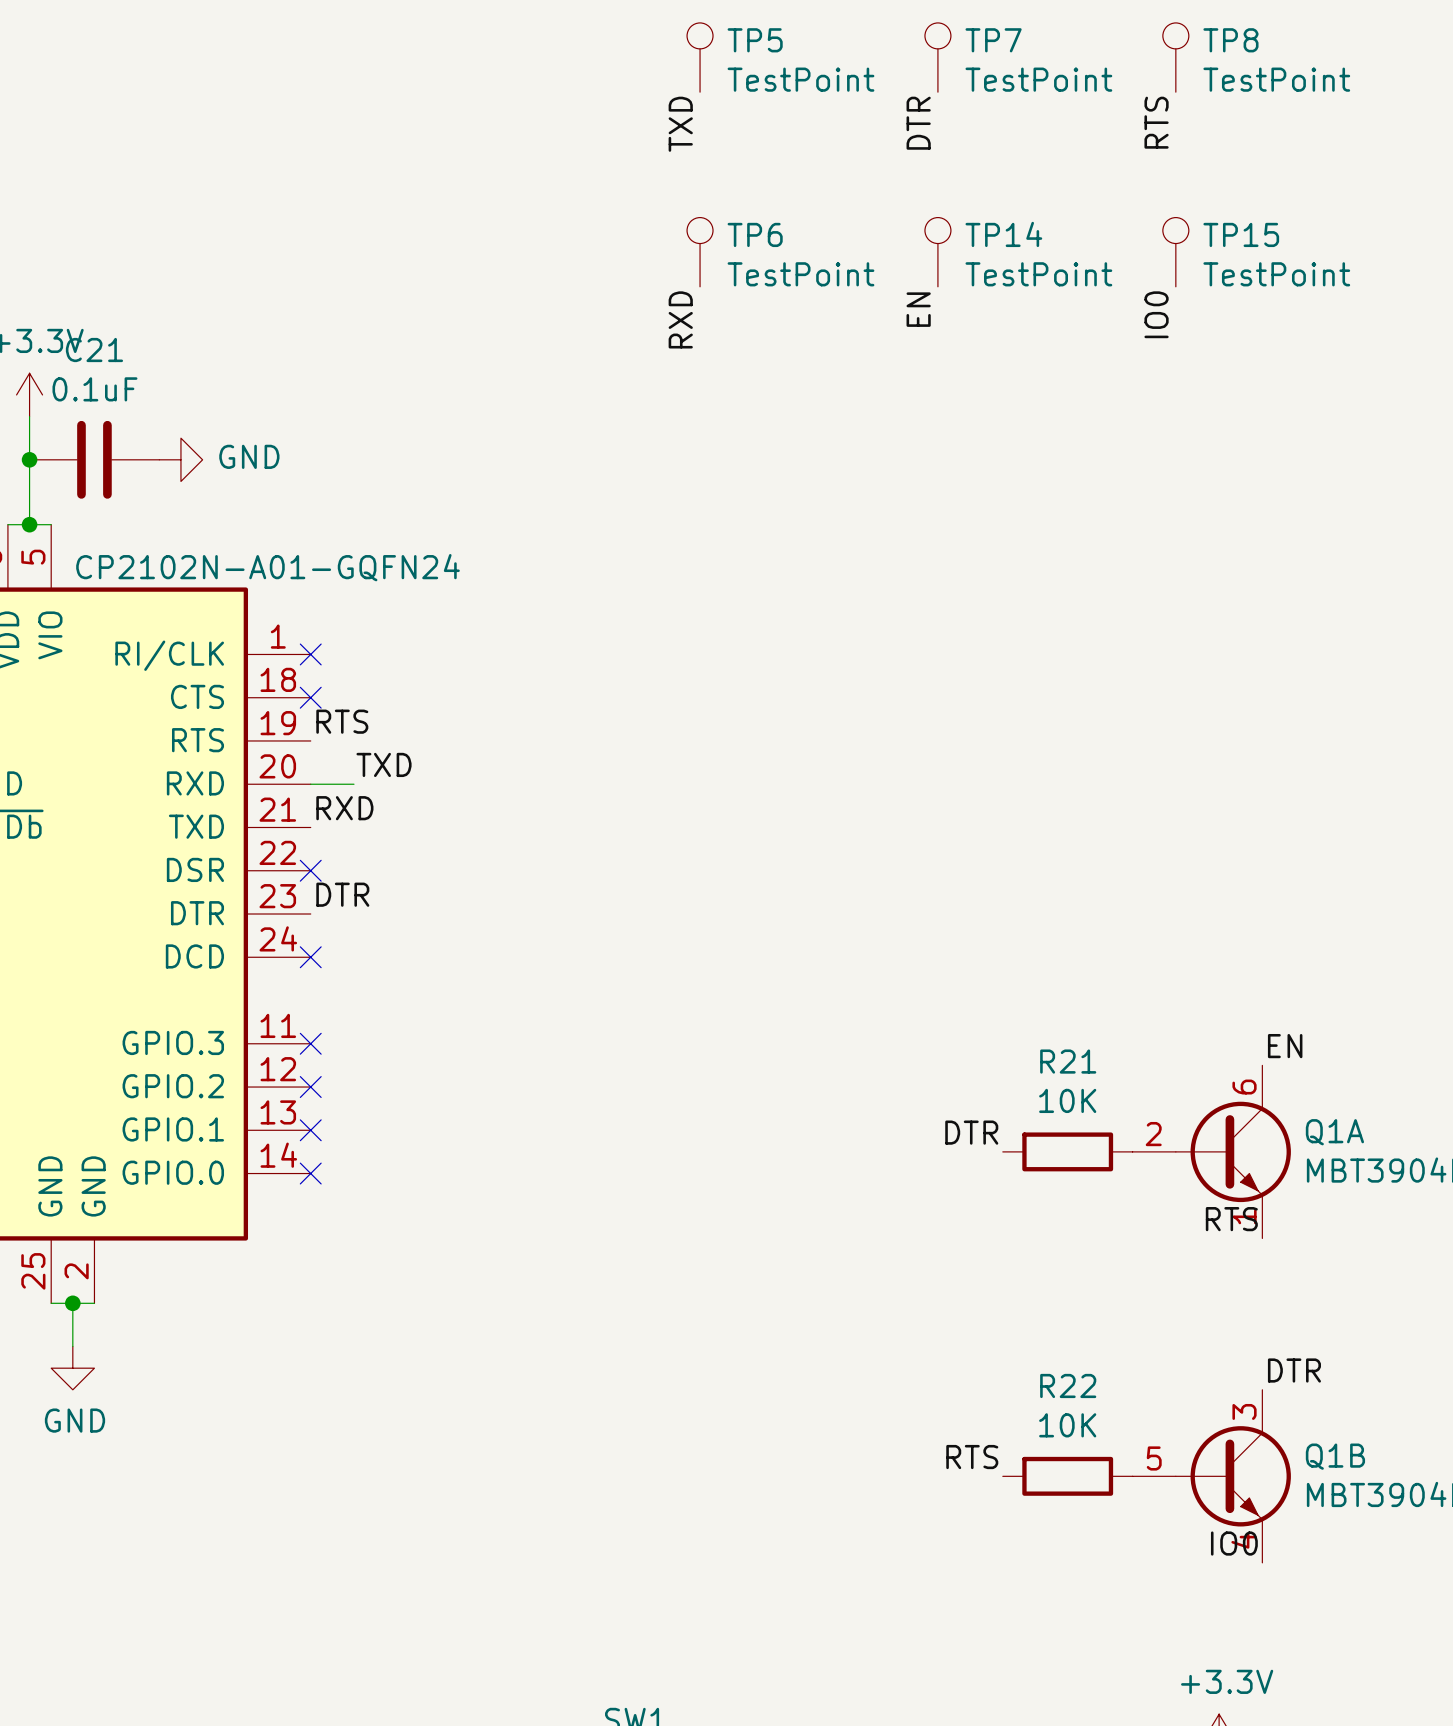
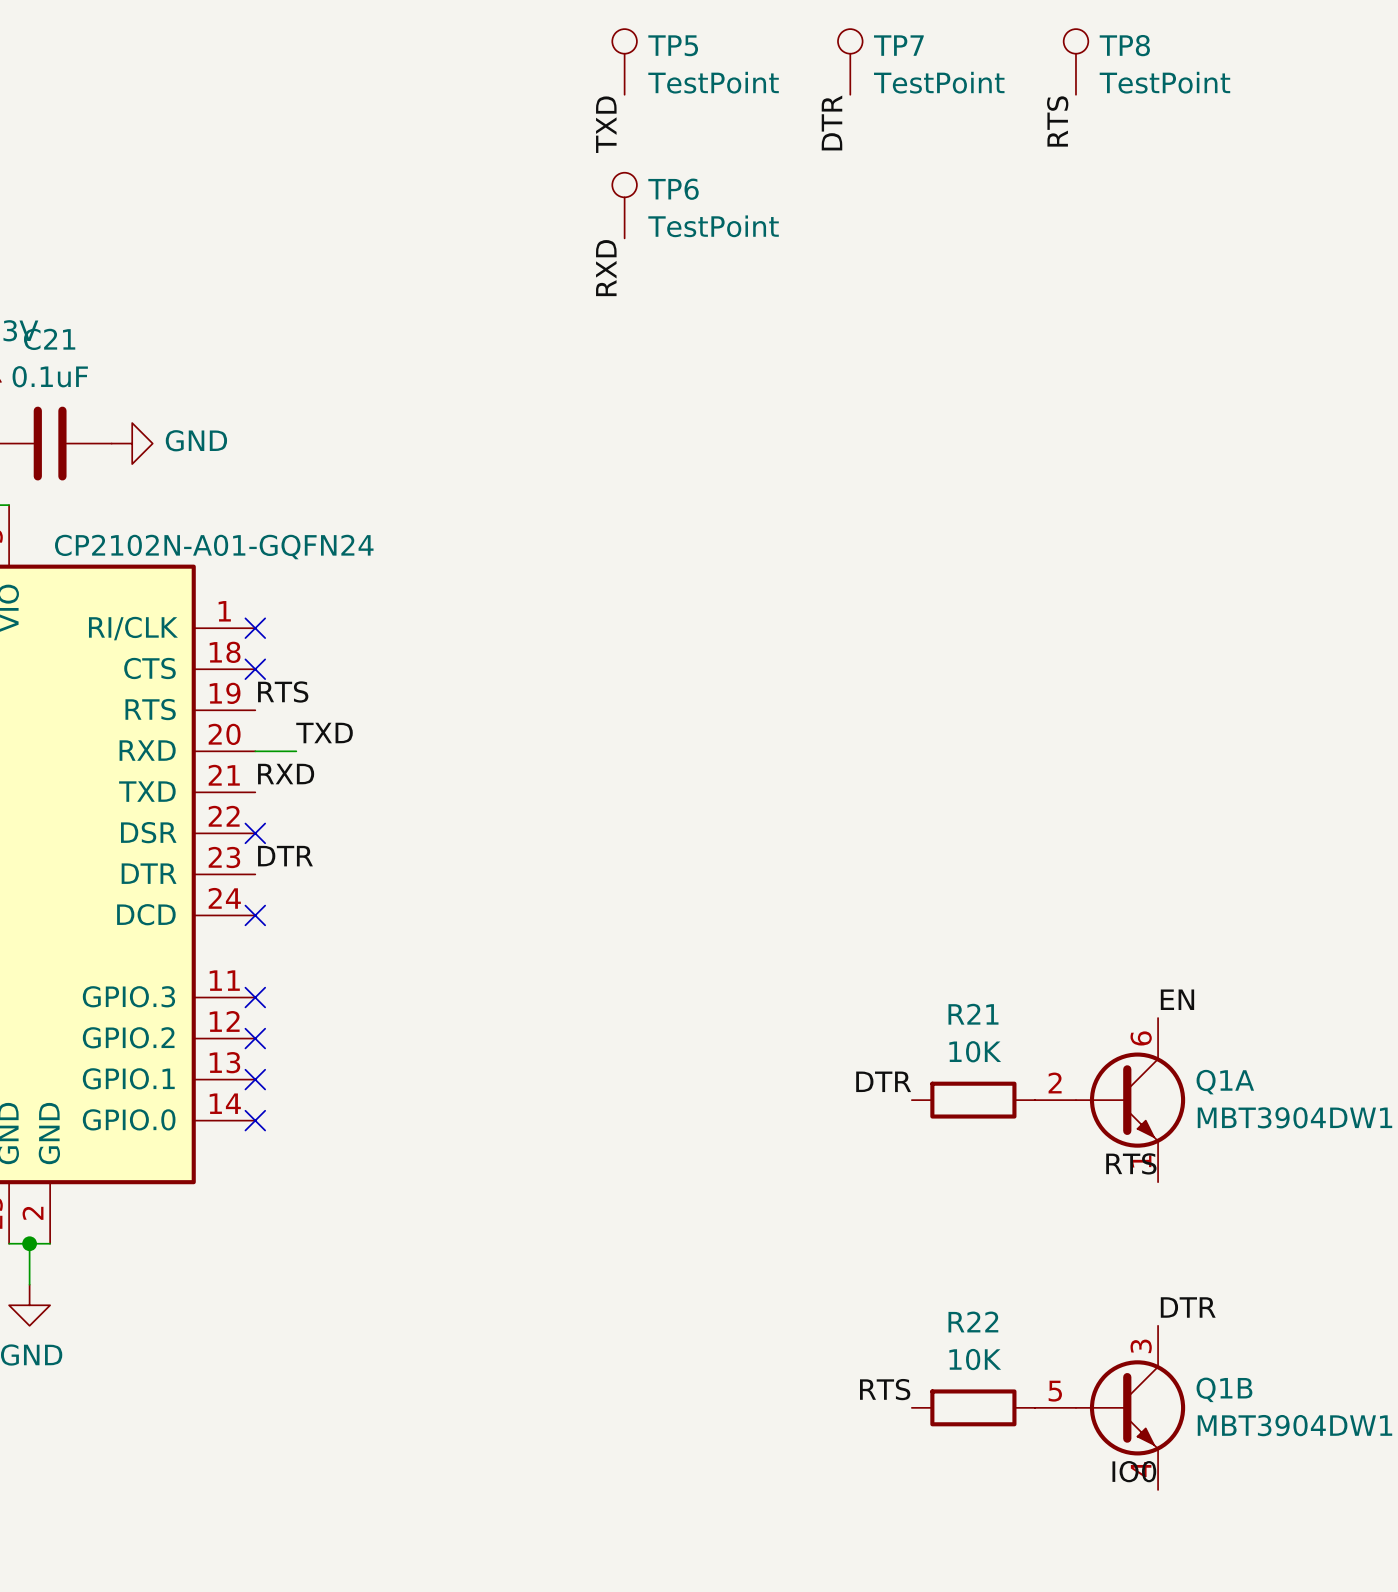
TP6 position: (700, 252) -> (624, 205)
TP14: TestPoint (937, 252) -> none
TP15: TestPoint (1175, 252) -> none
label: EN (918, 309) -> none
label: IO0 (1156, 314) -> none
label position: RXD (680, 319) -> RXD (606, 268)

